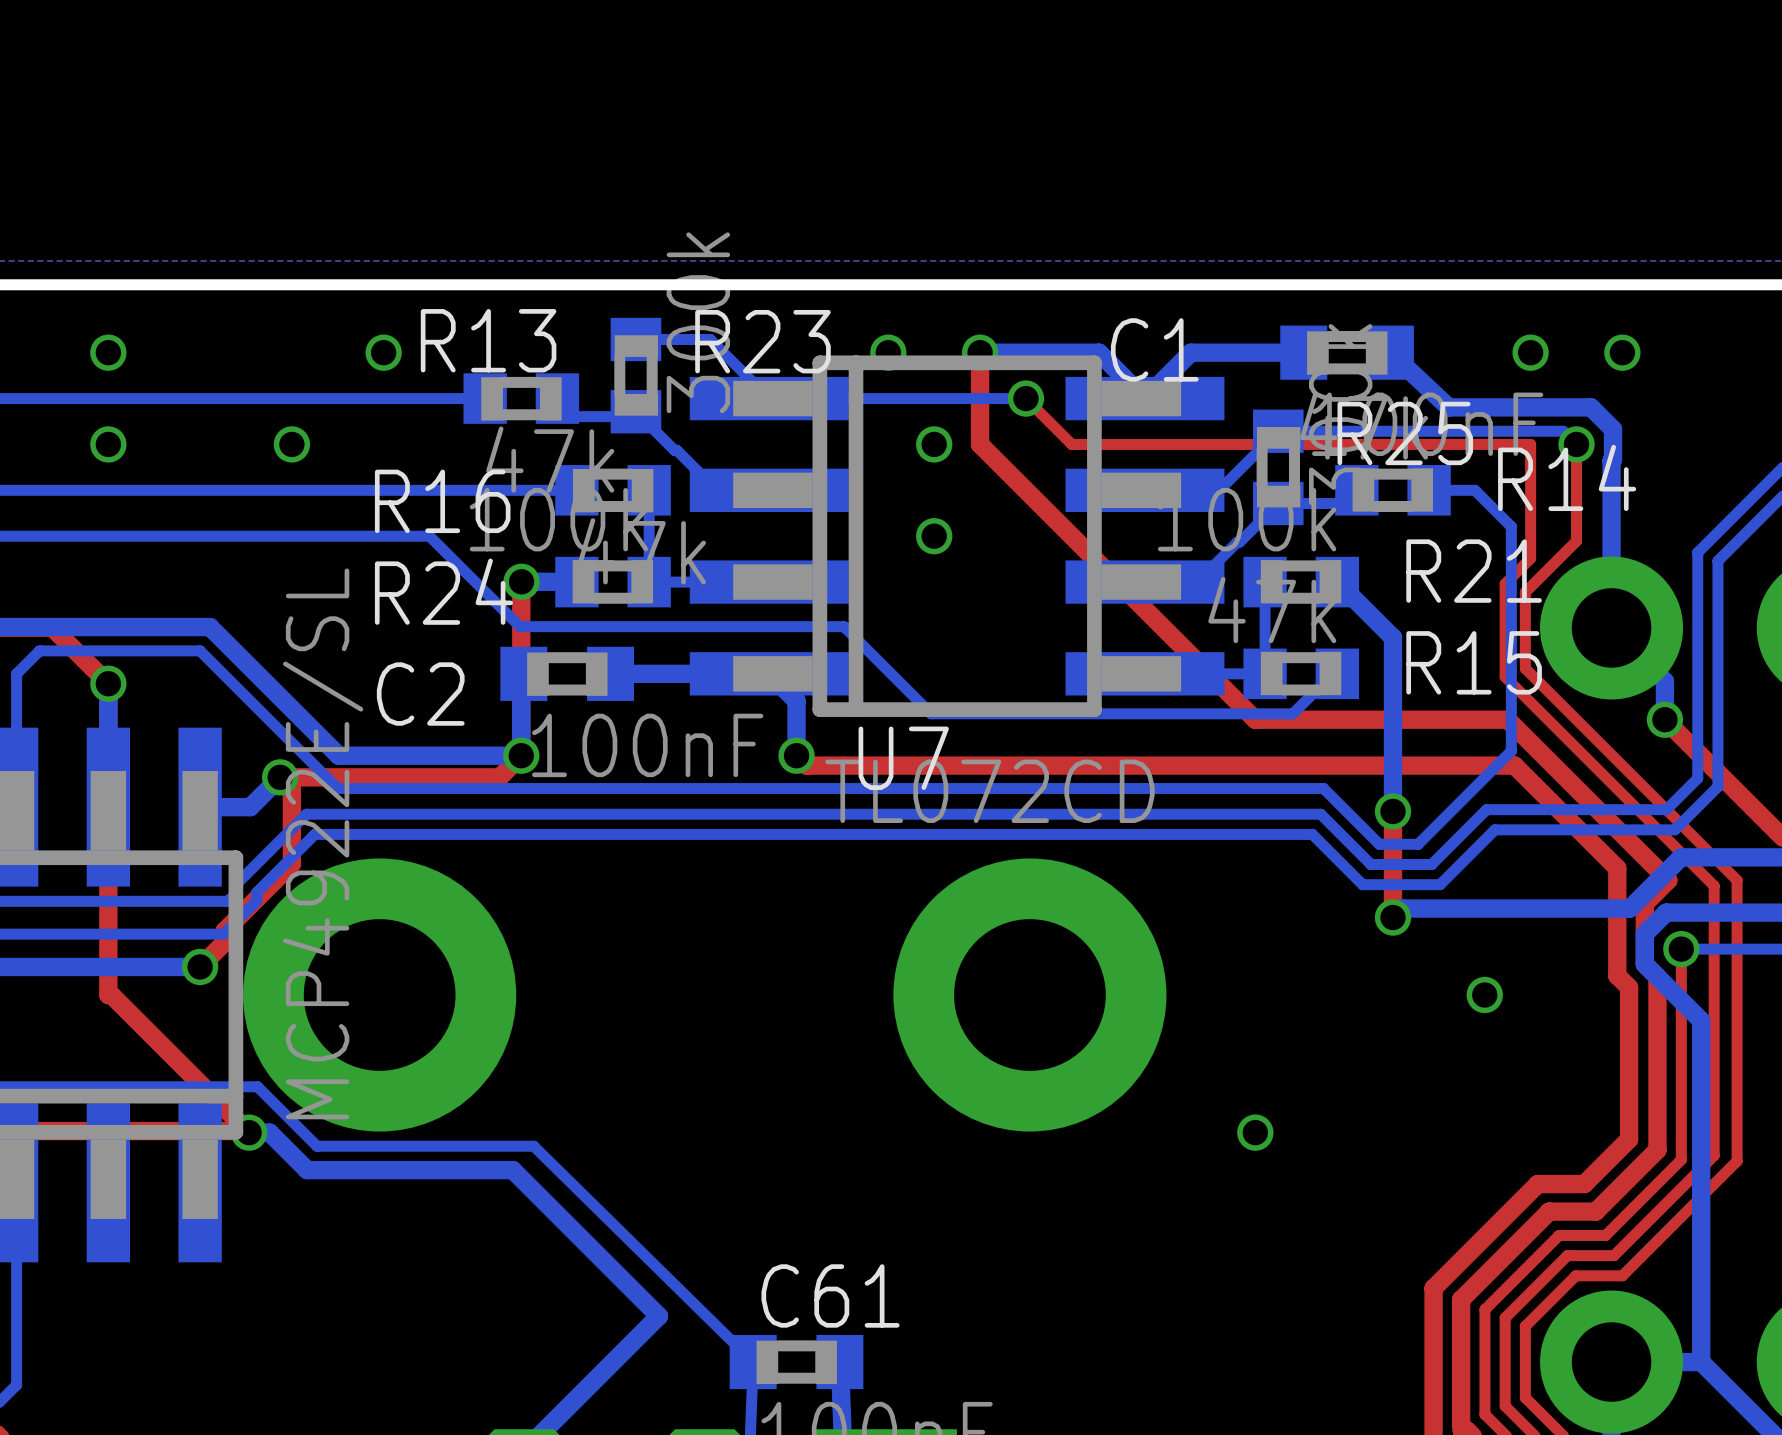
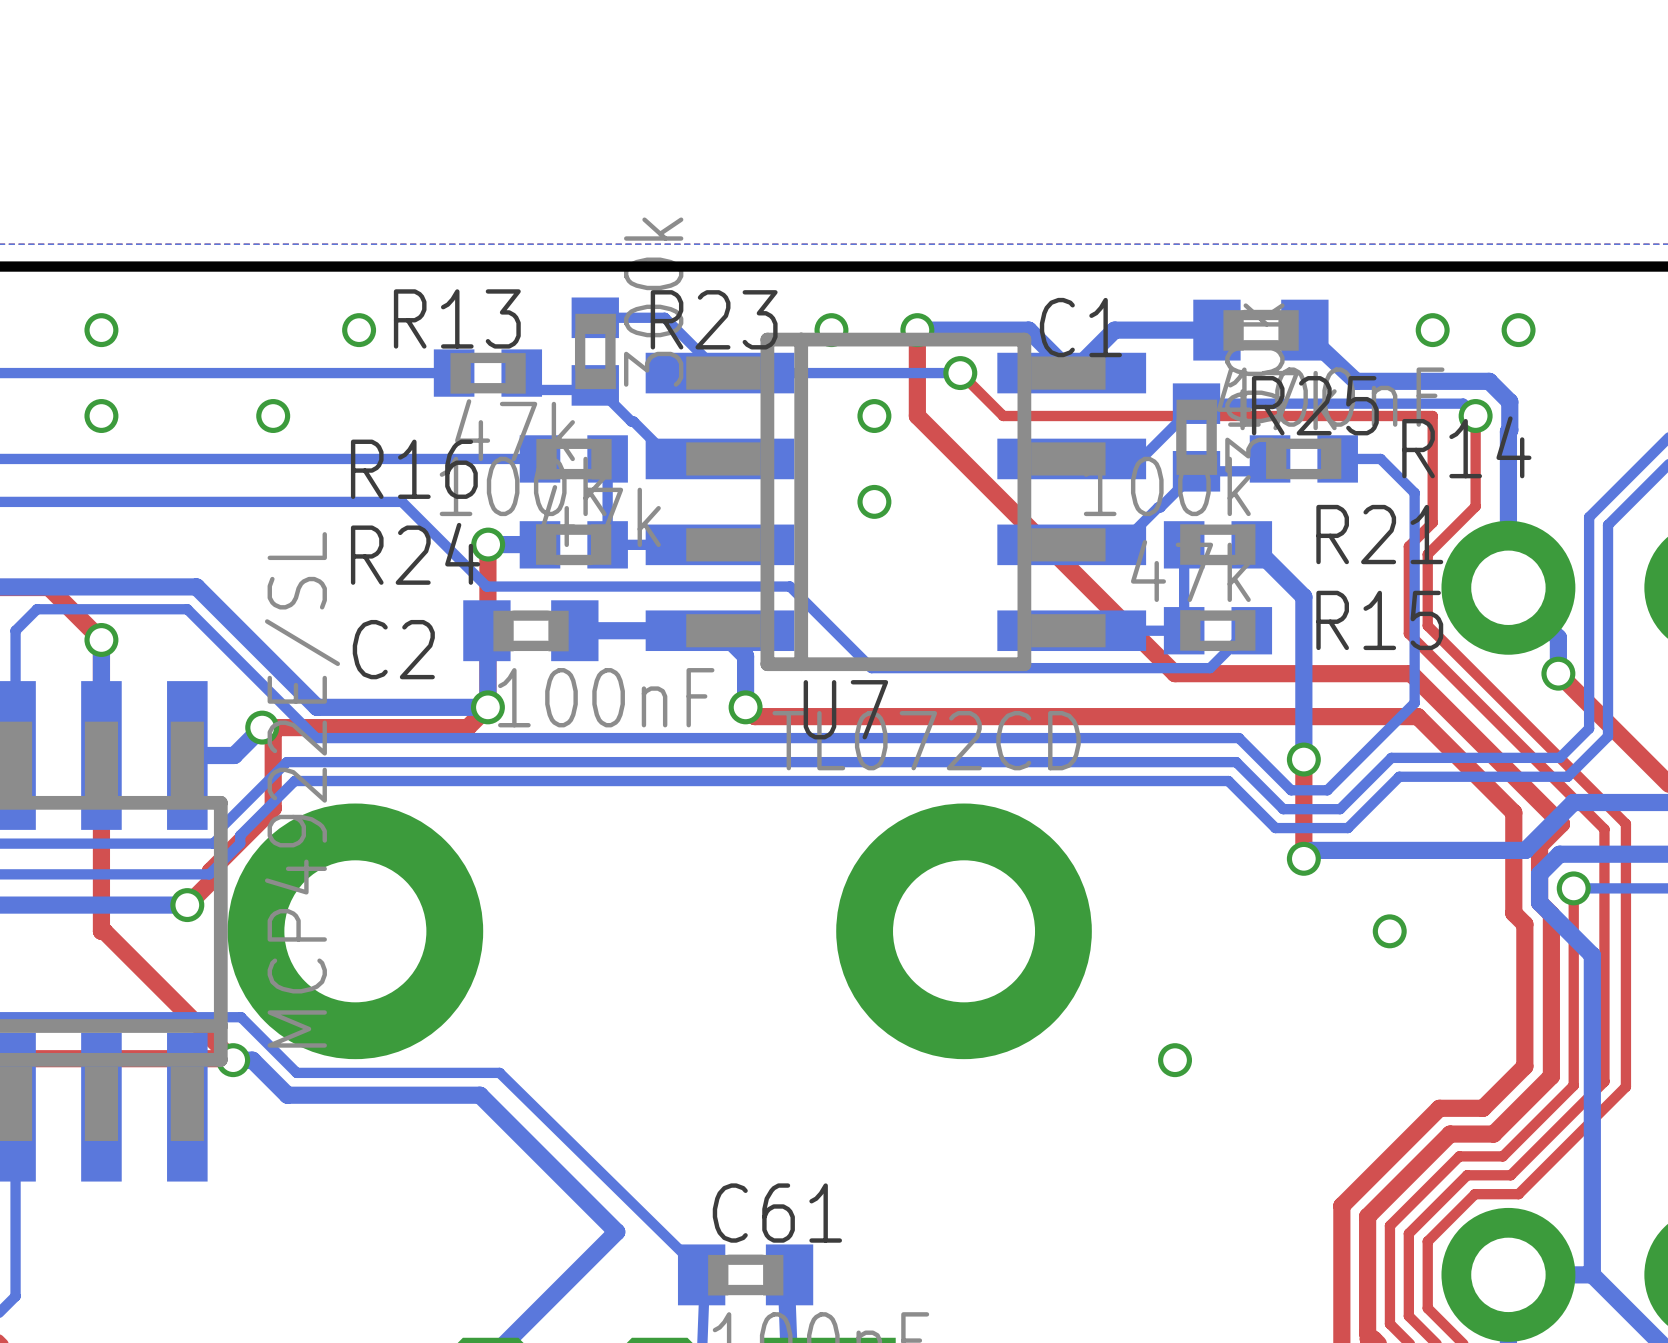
C1 footprint: [1280, 325, 1414, 380] -> [1193, 299, 1329, 361]
C2 footprint: [500, 646, 634, 701] -> [463, 600, 599, 662]
C61 footprint: [729, 1334, 864, 1390] -> [677, 1244, 814, 1306]

